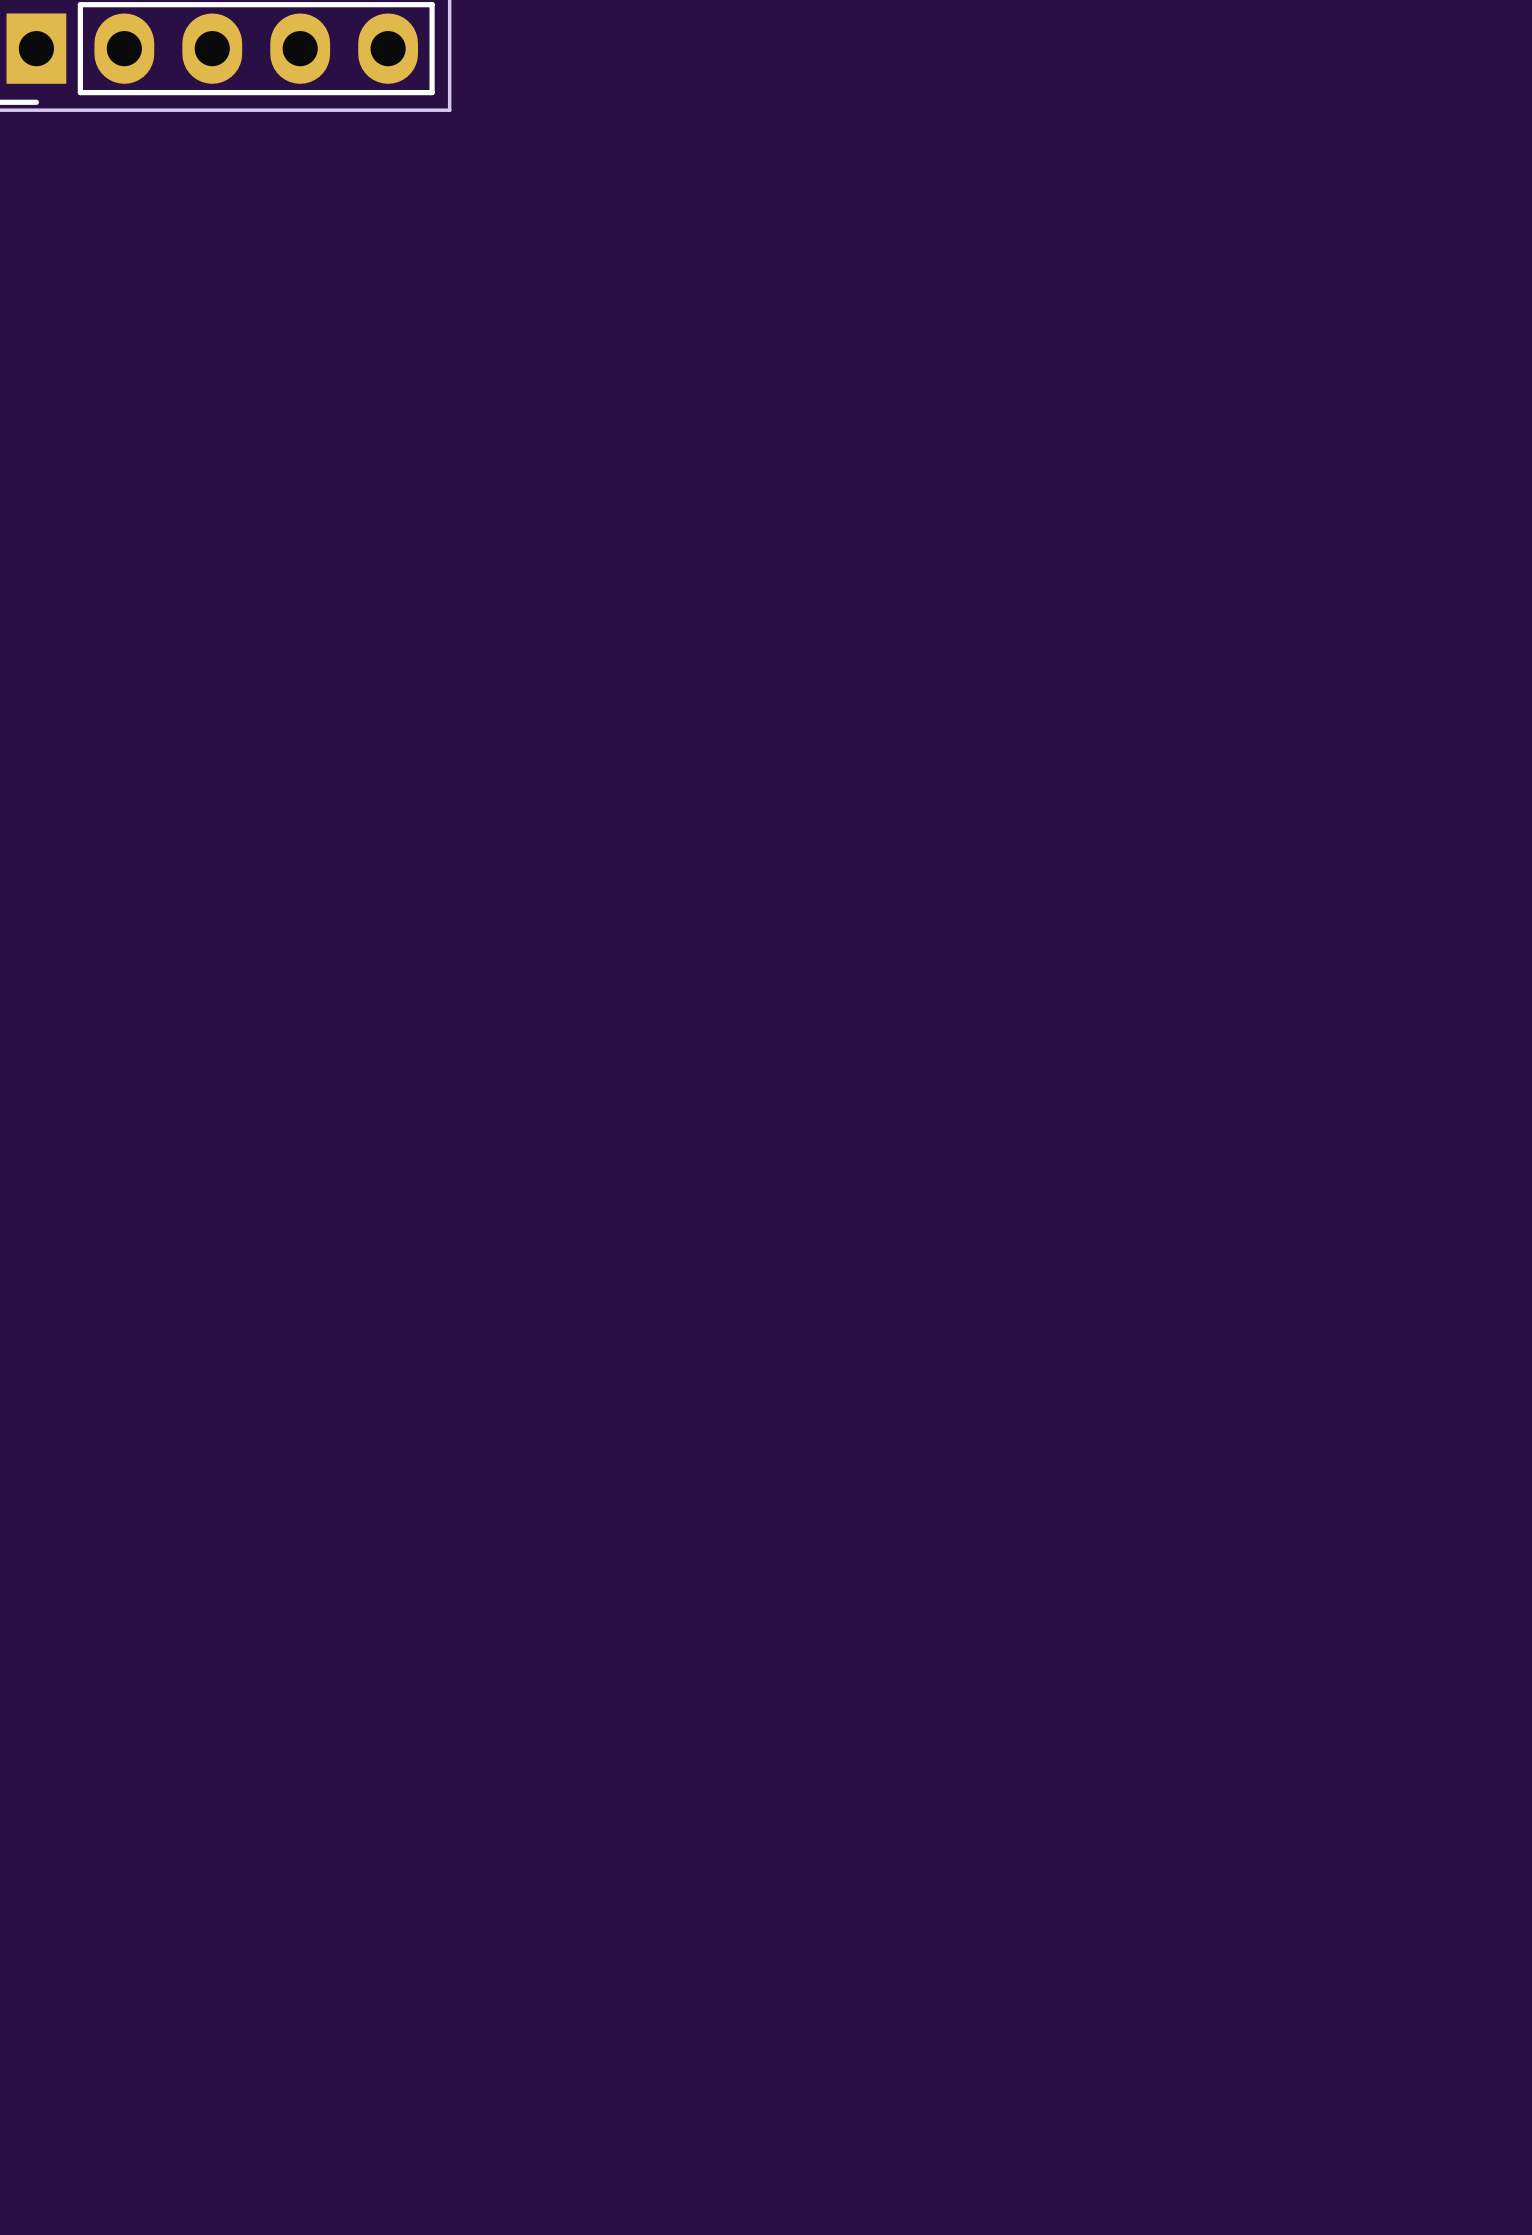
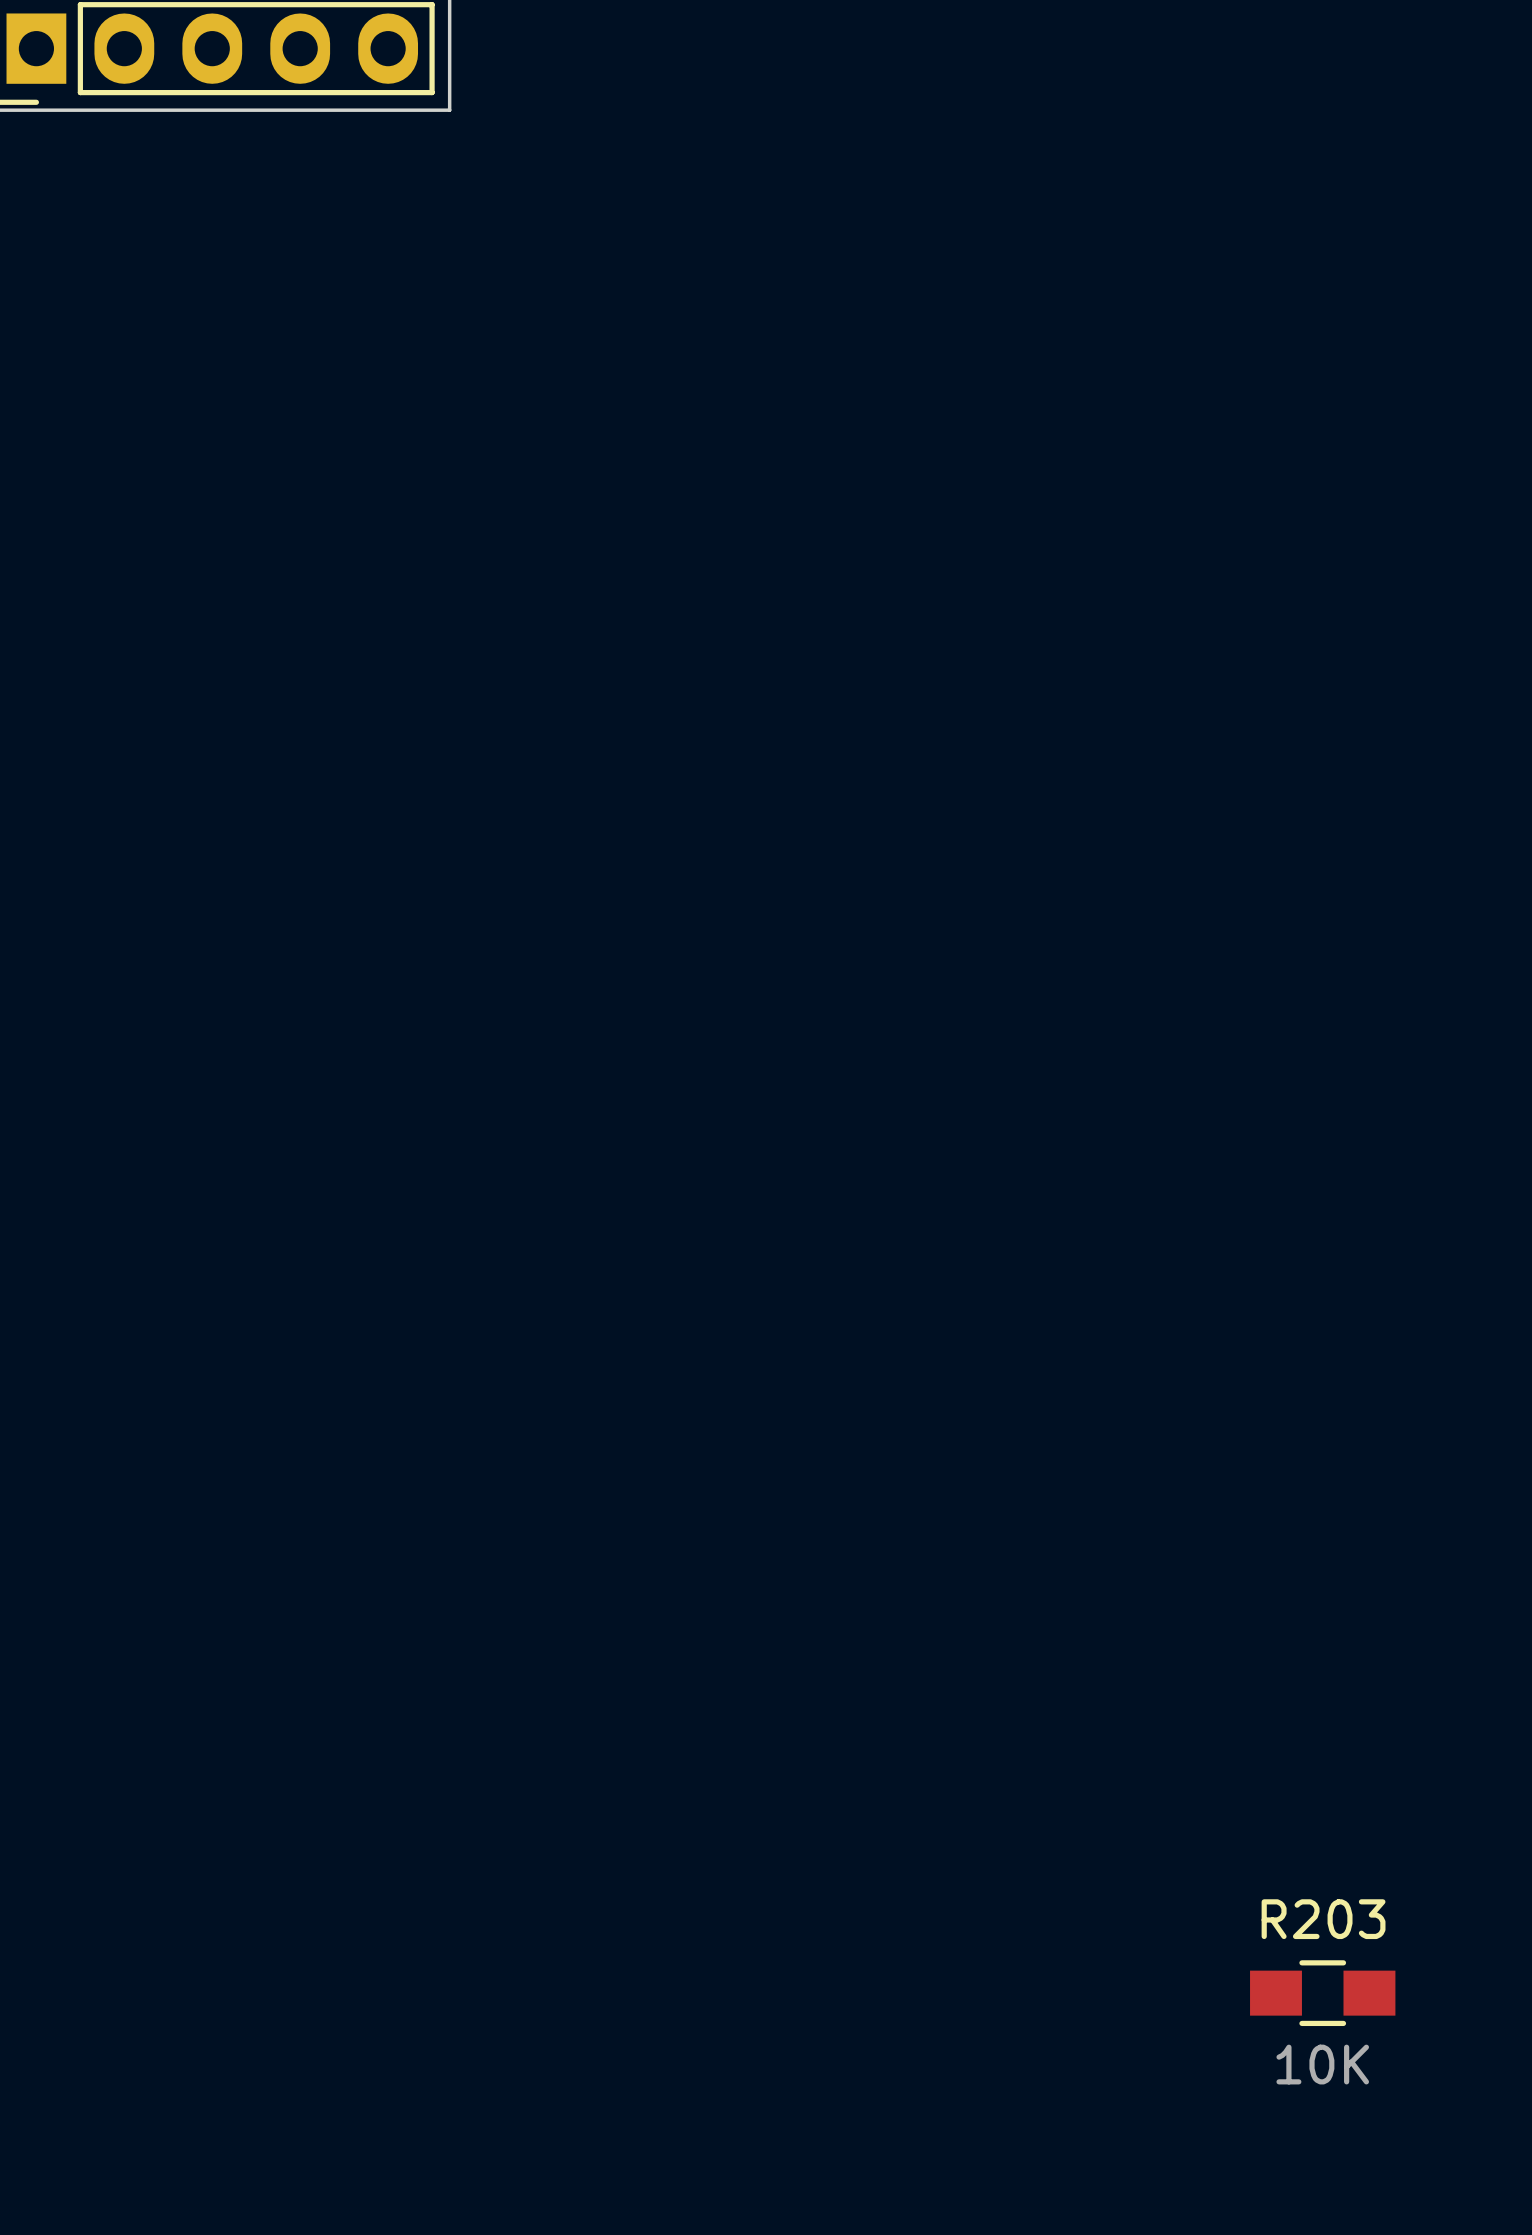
R203: none -> 10K (1322, 1993)

